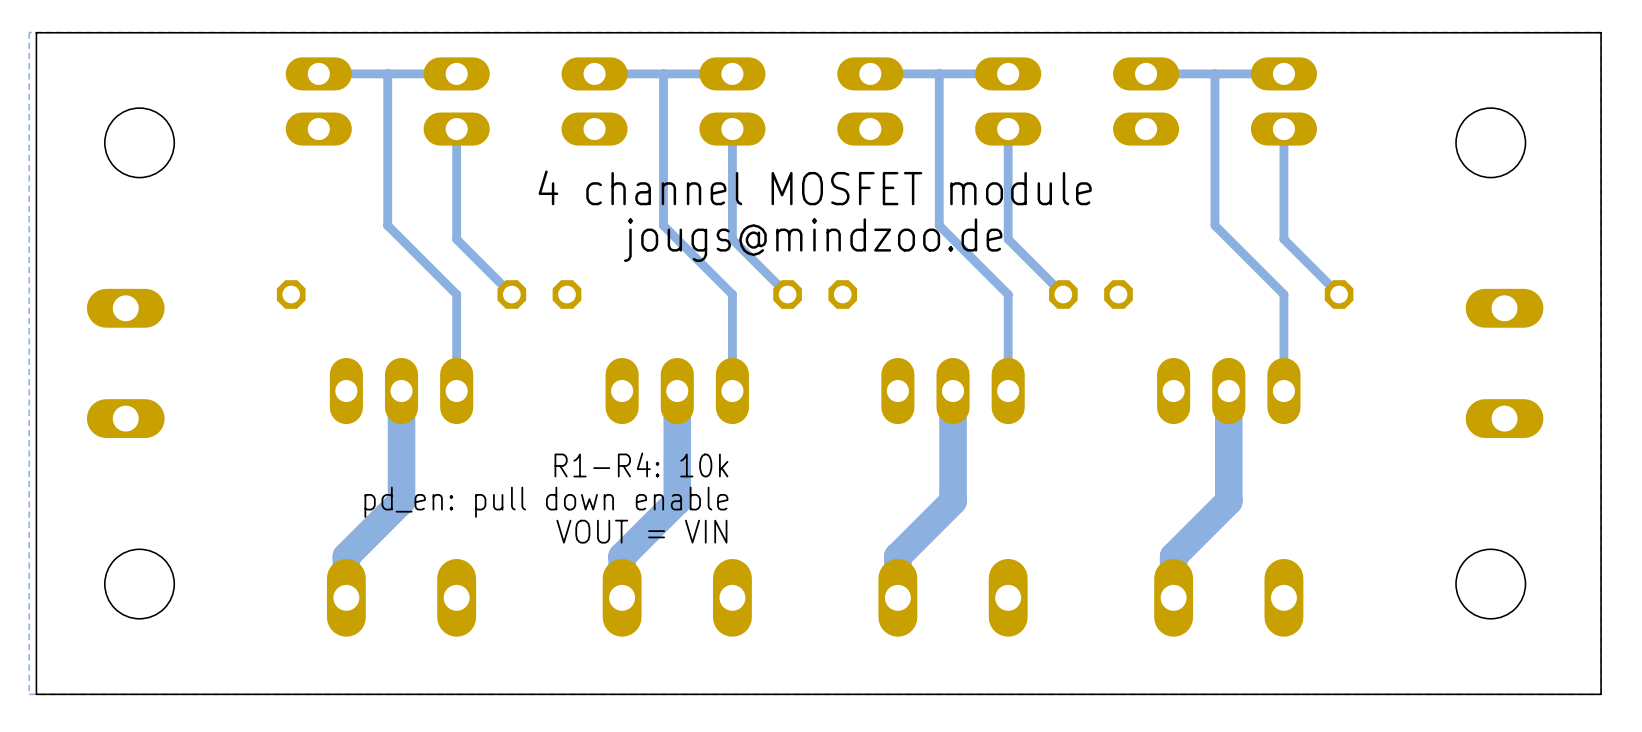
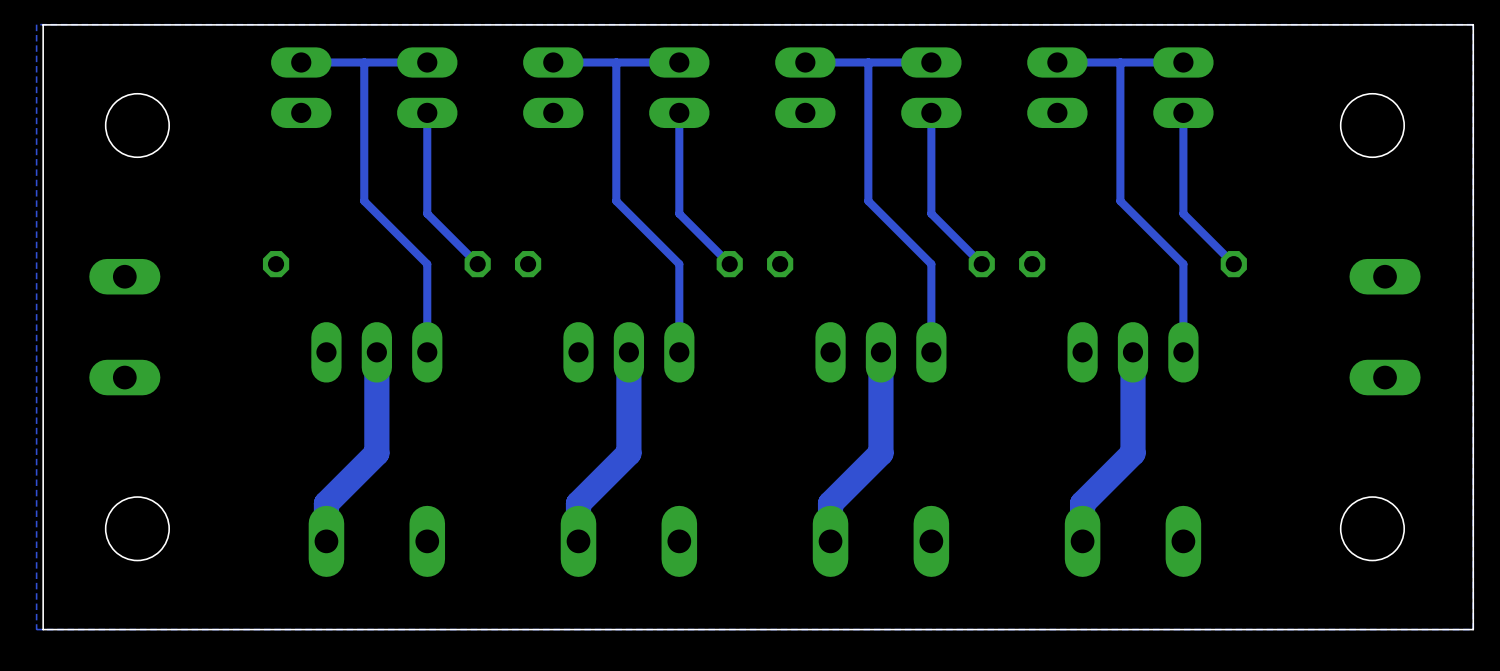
text: 4 channel MOSFET module (815, 187) -> none
text: jougs@mindzoo.de (813, 240) -> none
text: R1-R4: 10k (641, 464) -> none
text: pd_en: pull down enable (546, 502) -> none
text: VOUT = VIN (641, 531) -> none

